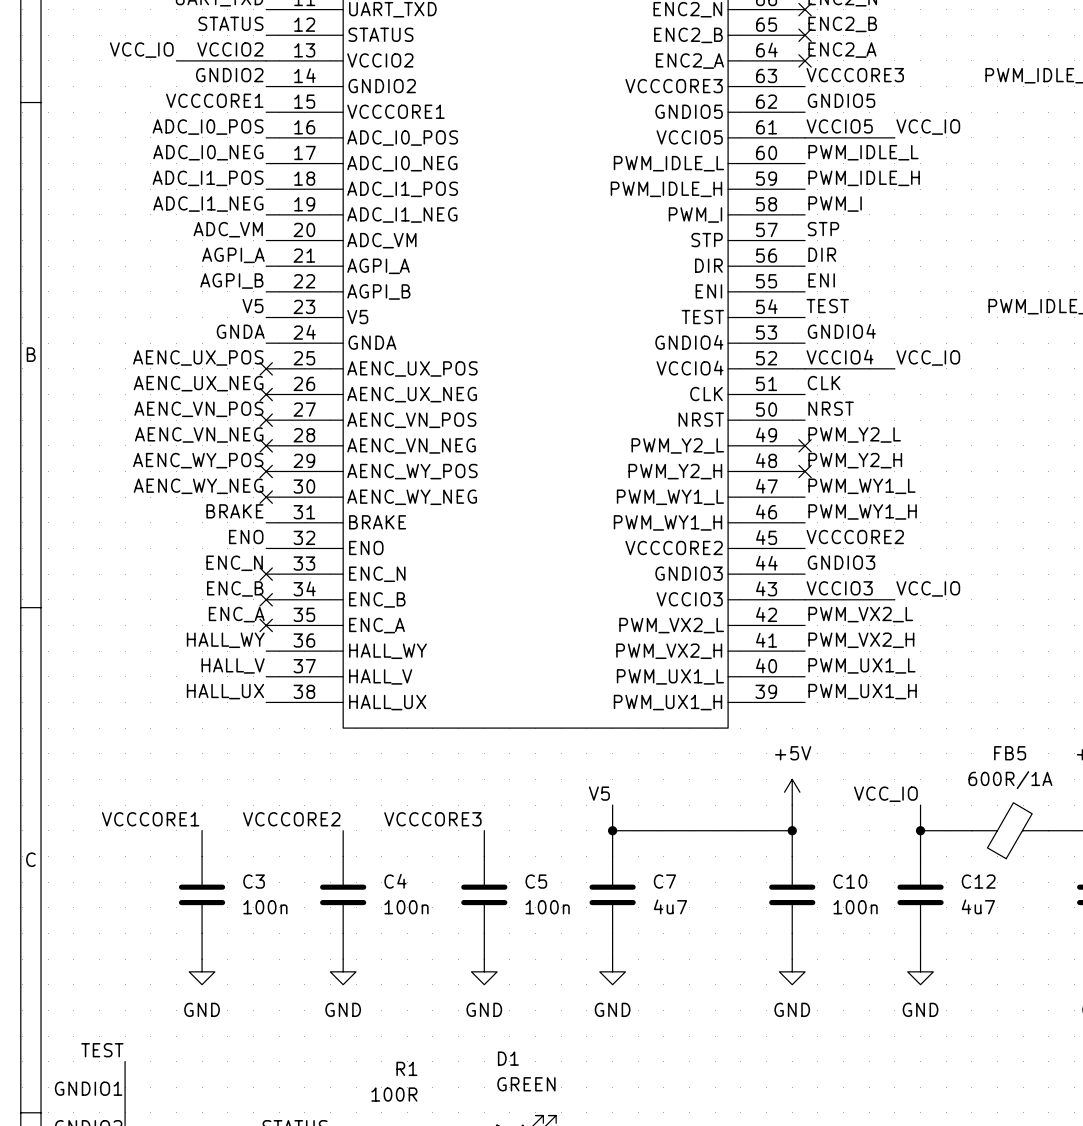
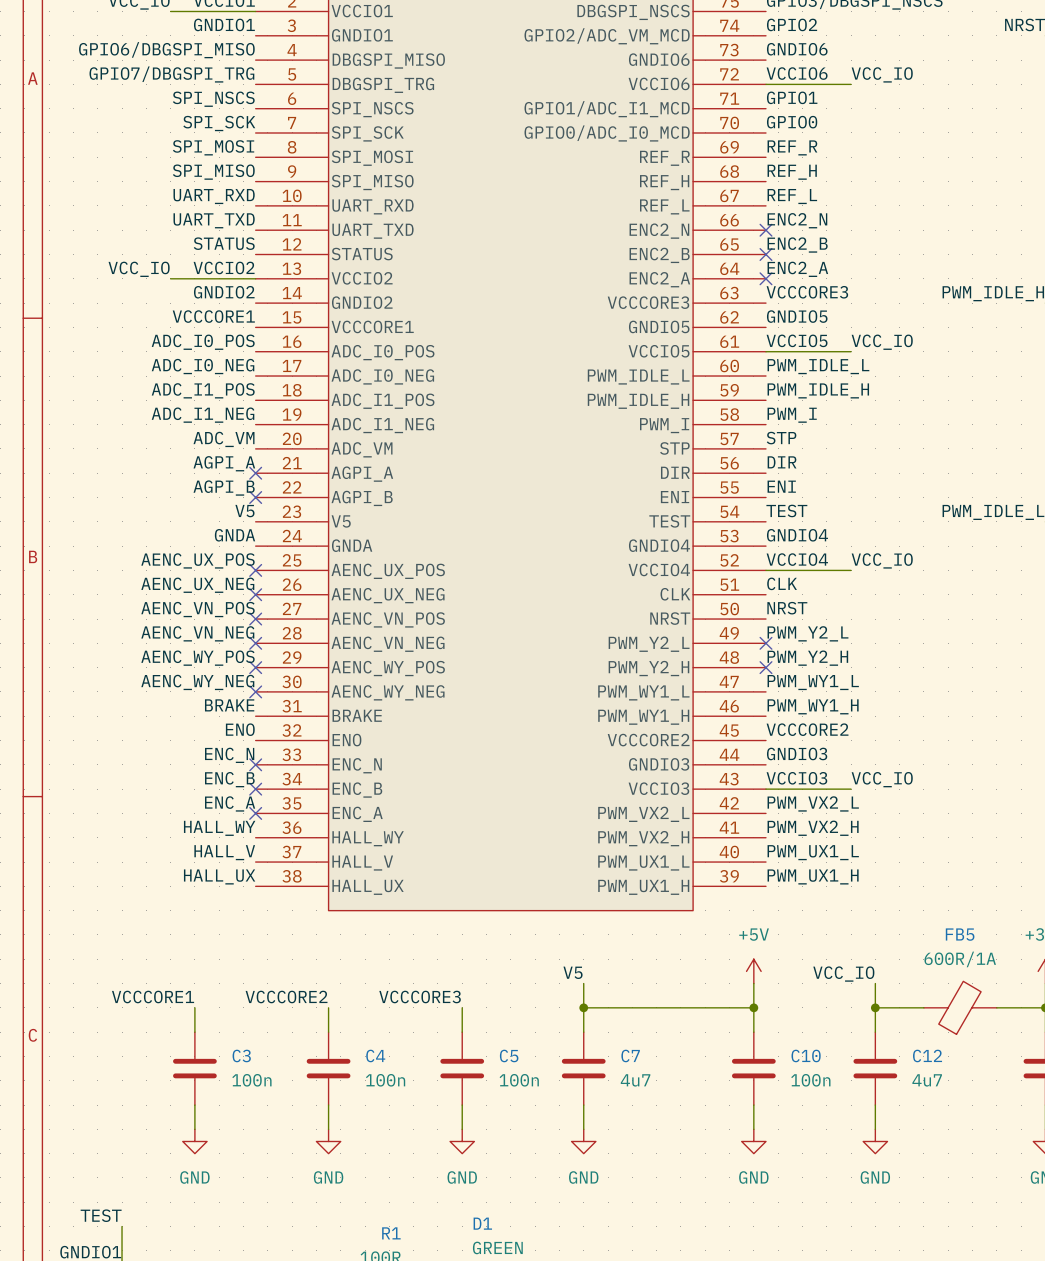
no-connect mark: none -> (255, 473)
no-connect mark: none -> (255, 497)

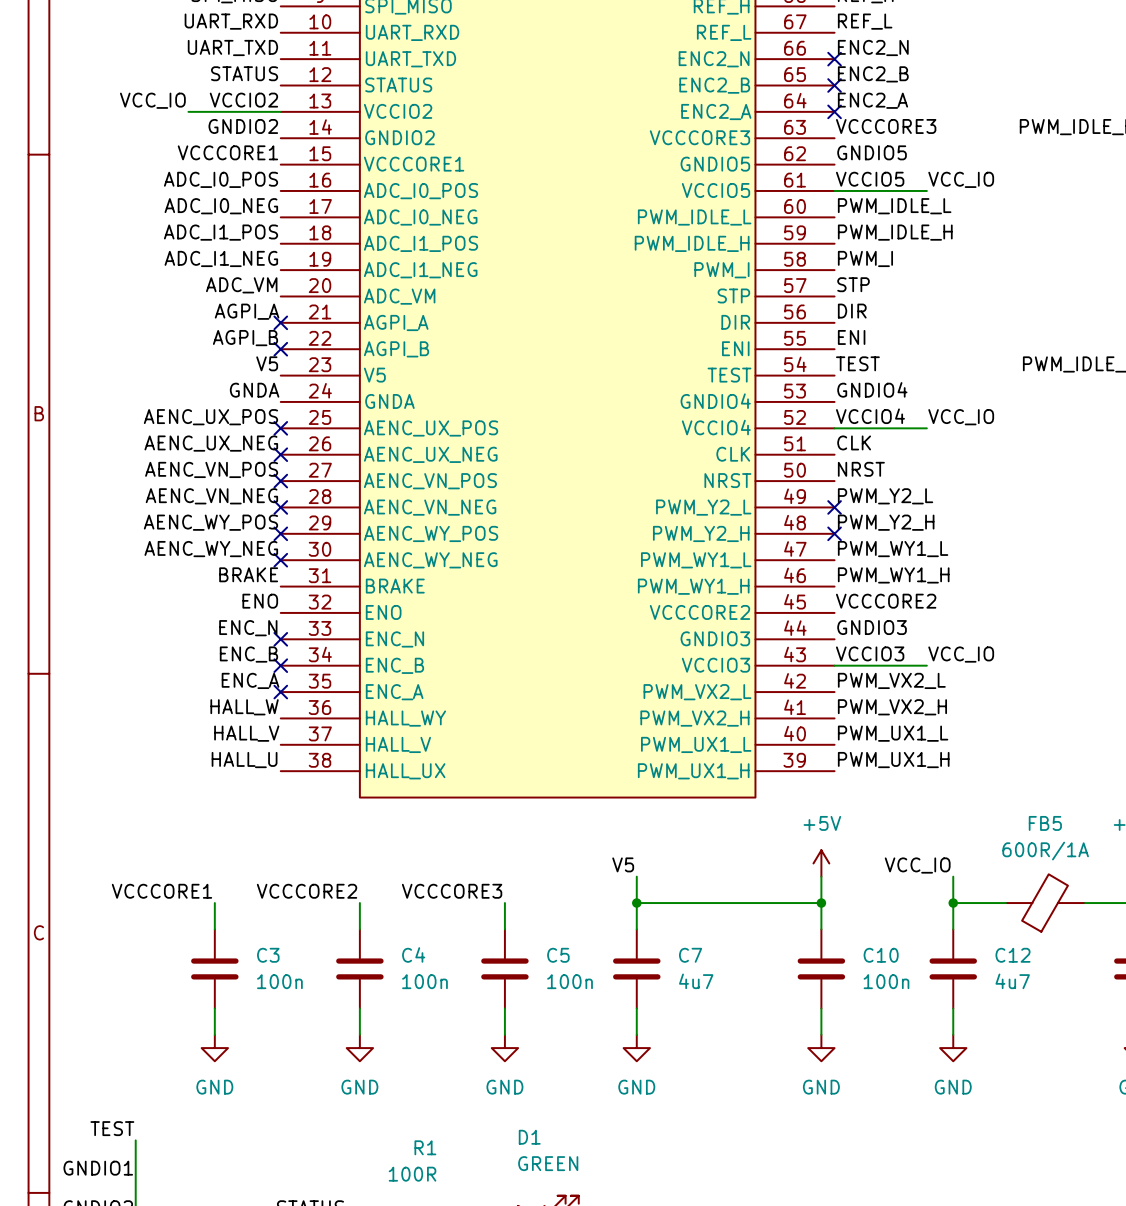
label: HALL_WY (219, 828) -> HALL_W (244, 707)
label: HALL_UX (219, 876) -> HALL_U (244, 760)

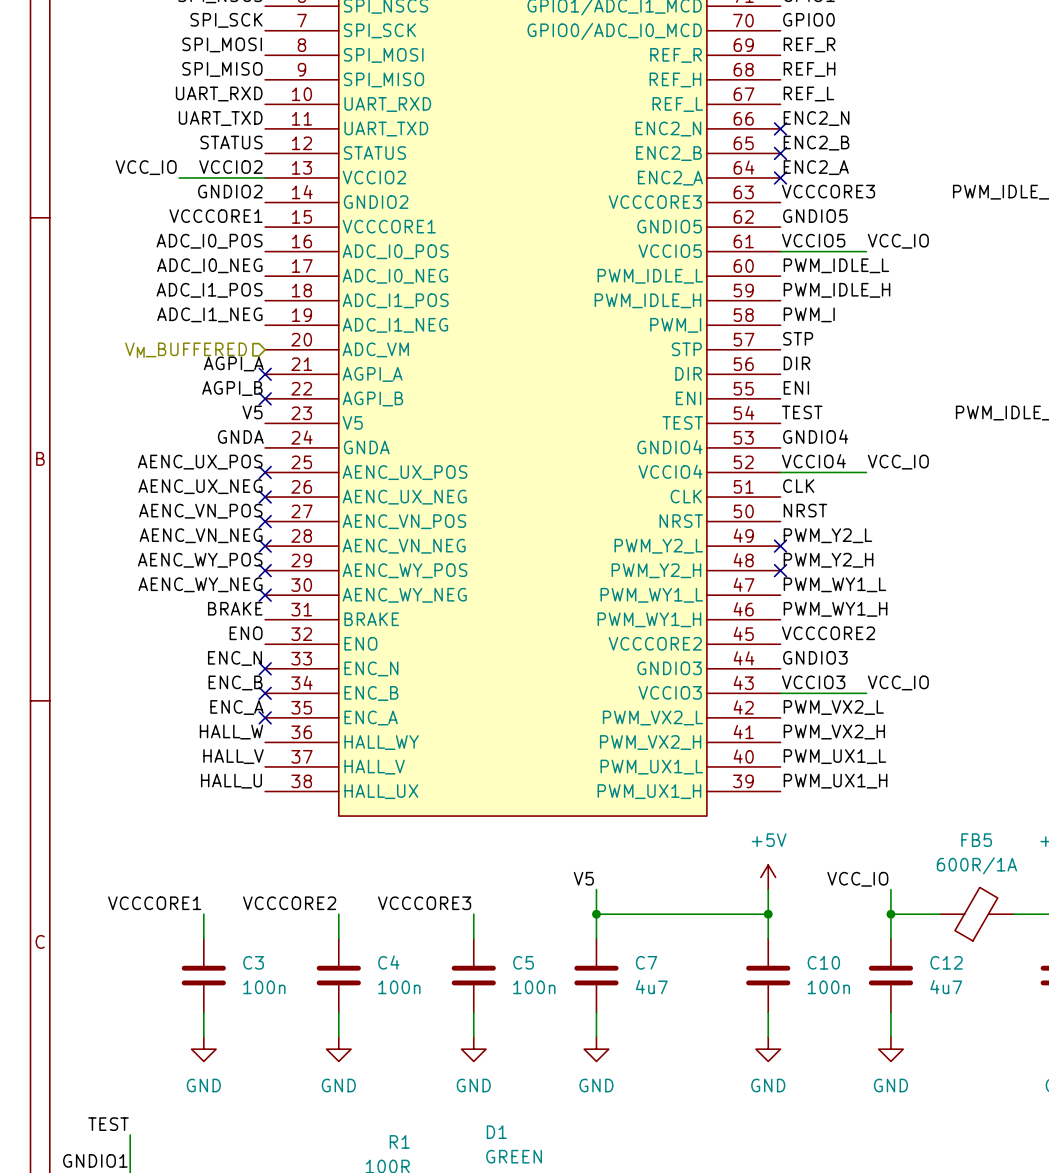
label: ADC_VM (241, 285) -> none
hierarchical label: none -> VM_BUFFERED (186, 350)

